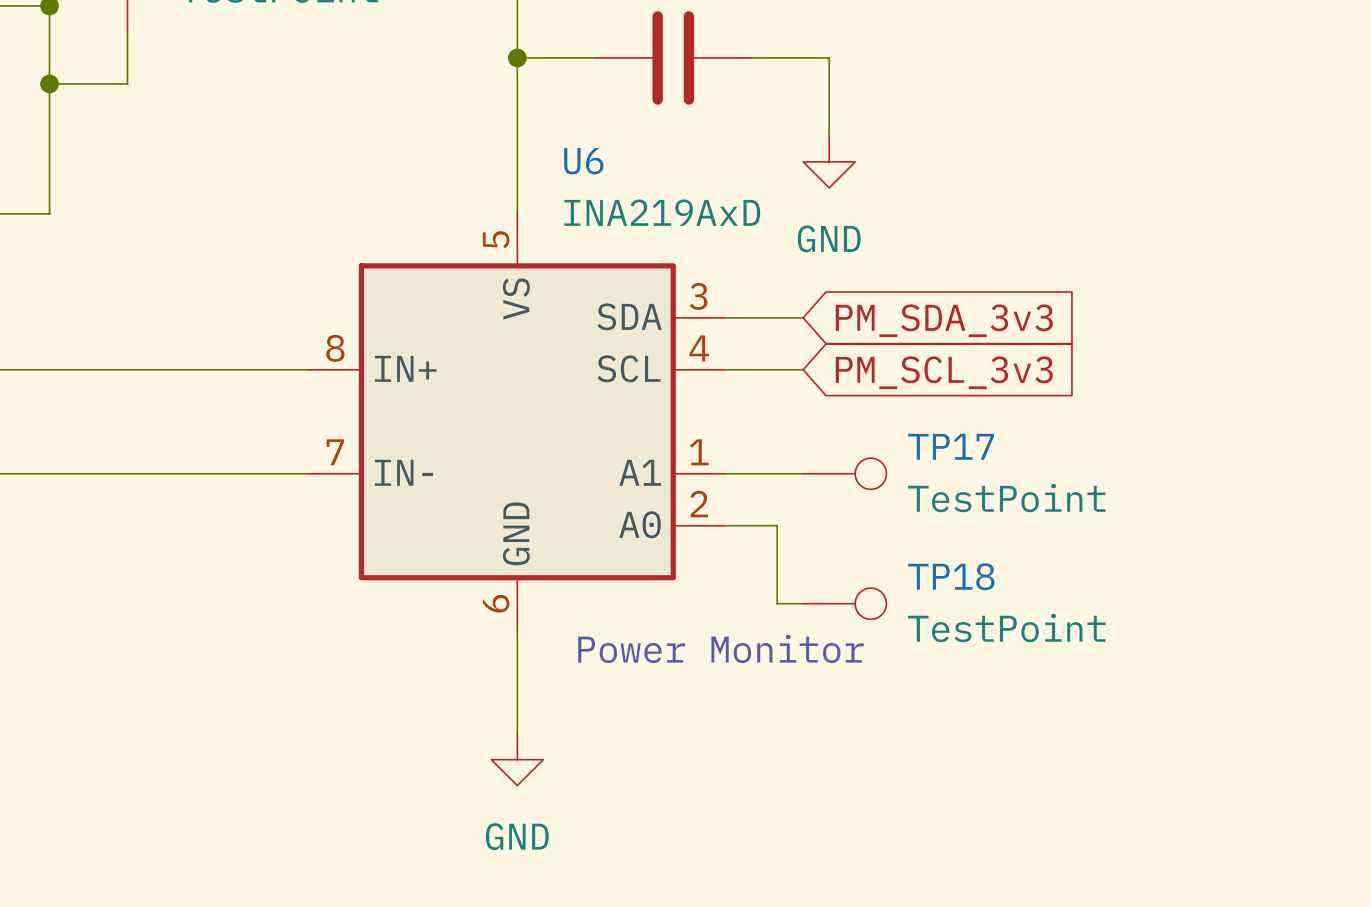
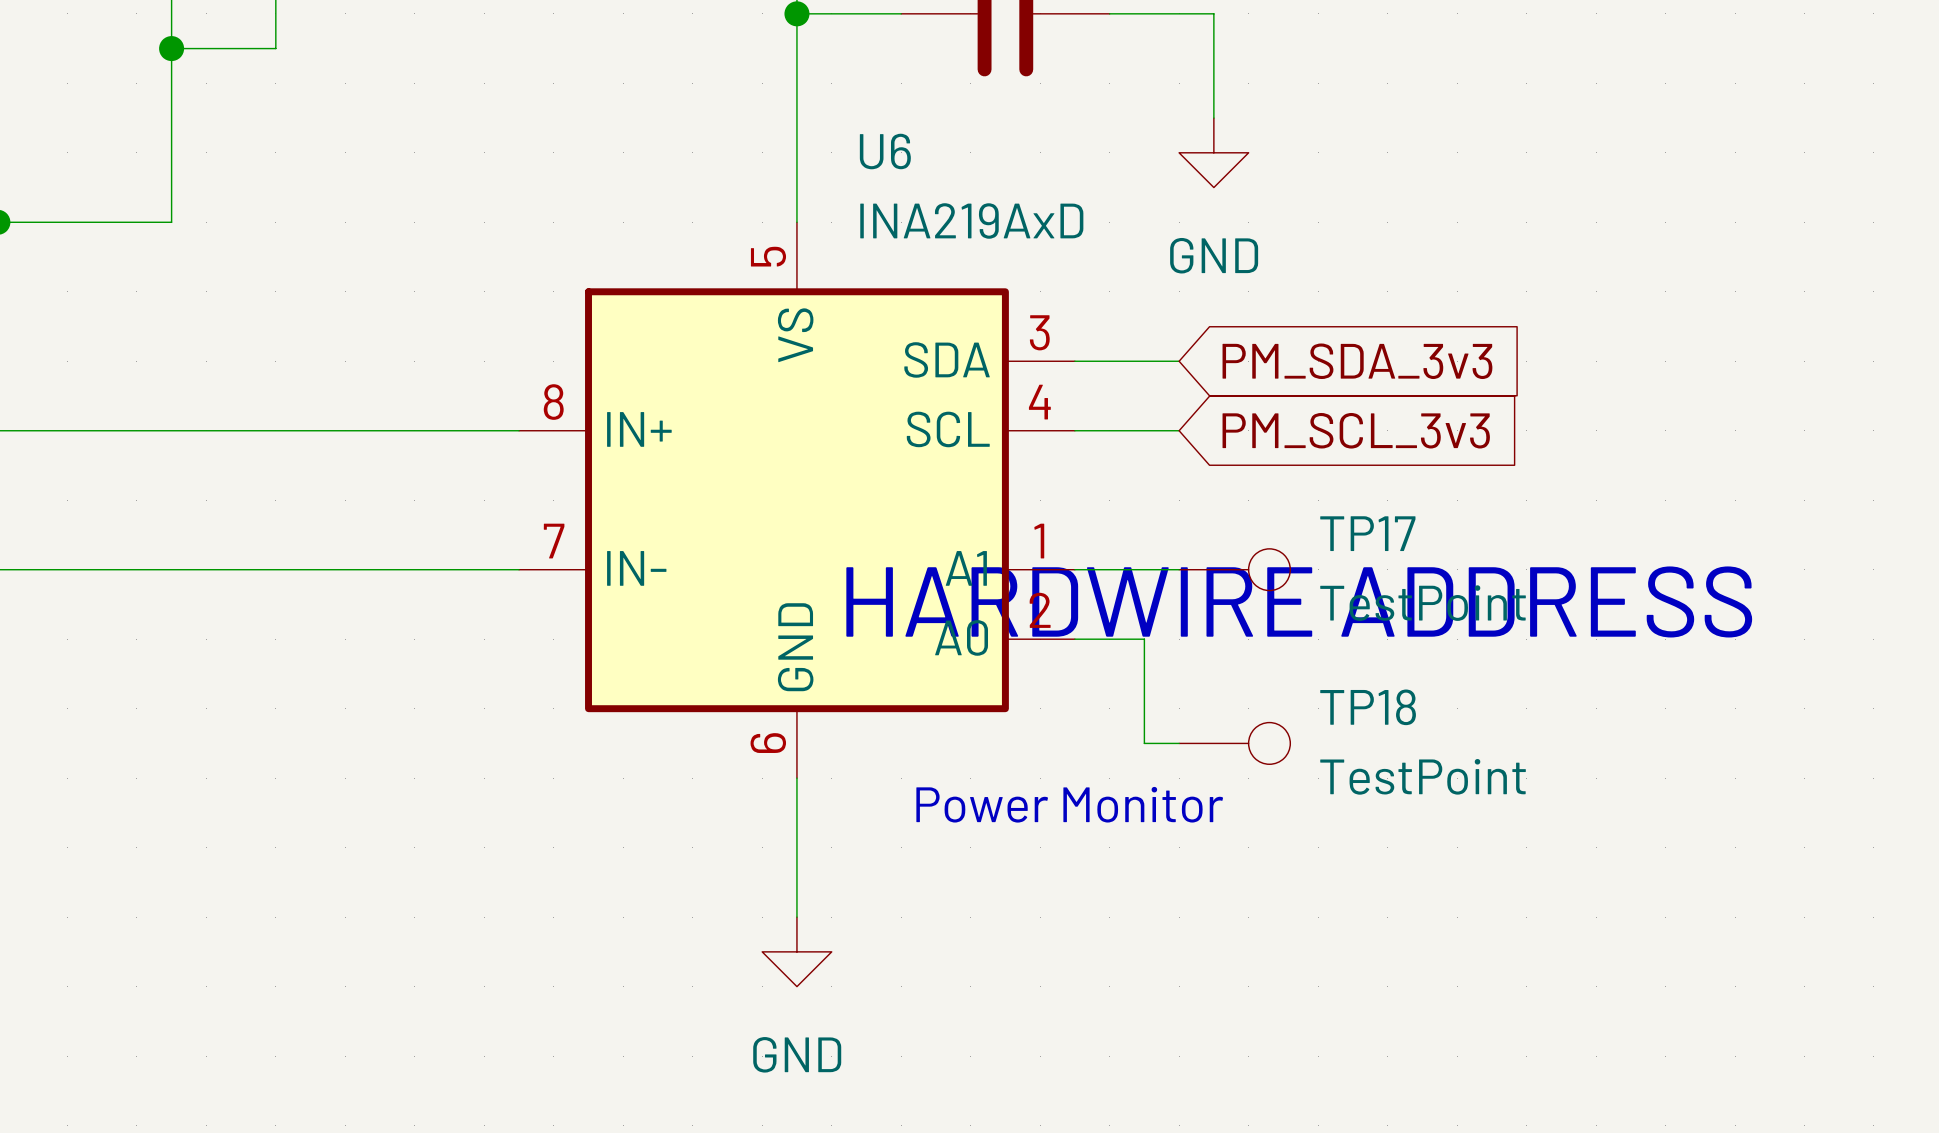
text: none -> HARDWIRE ADDRESS (1299, 601)

